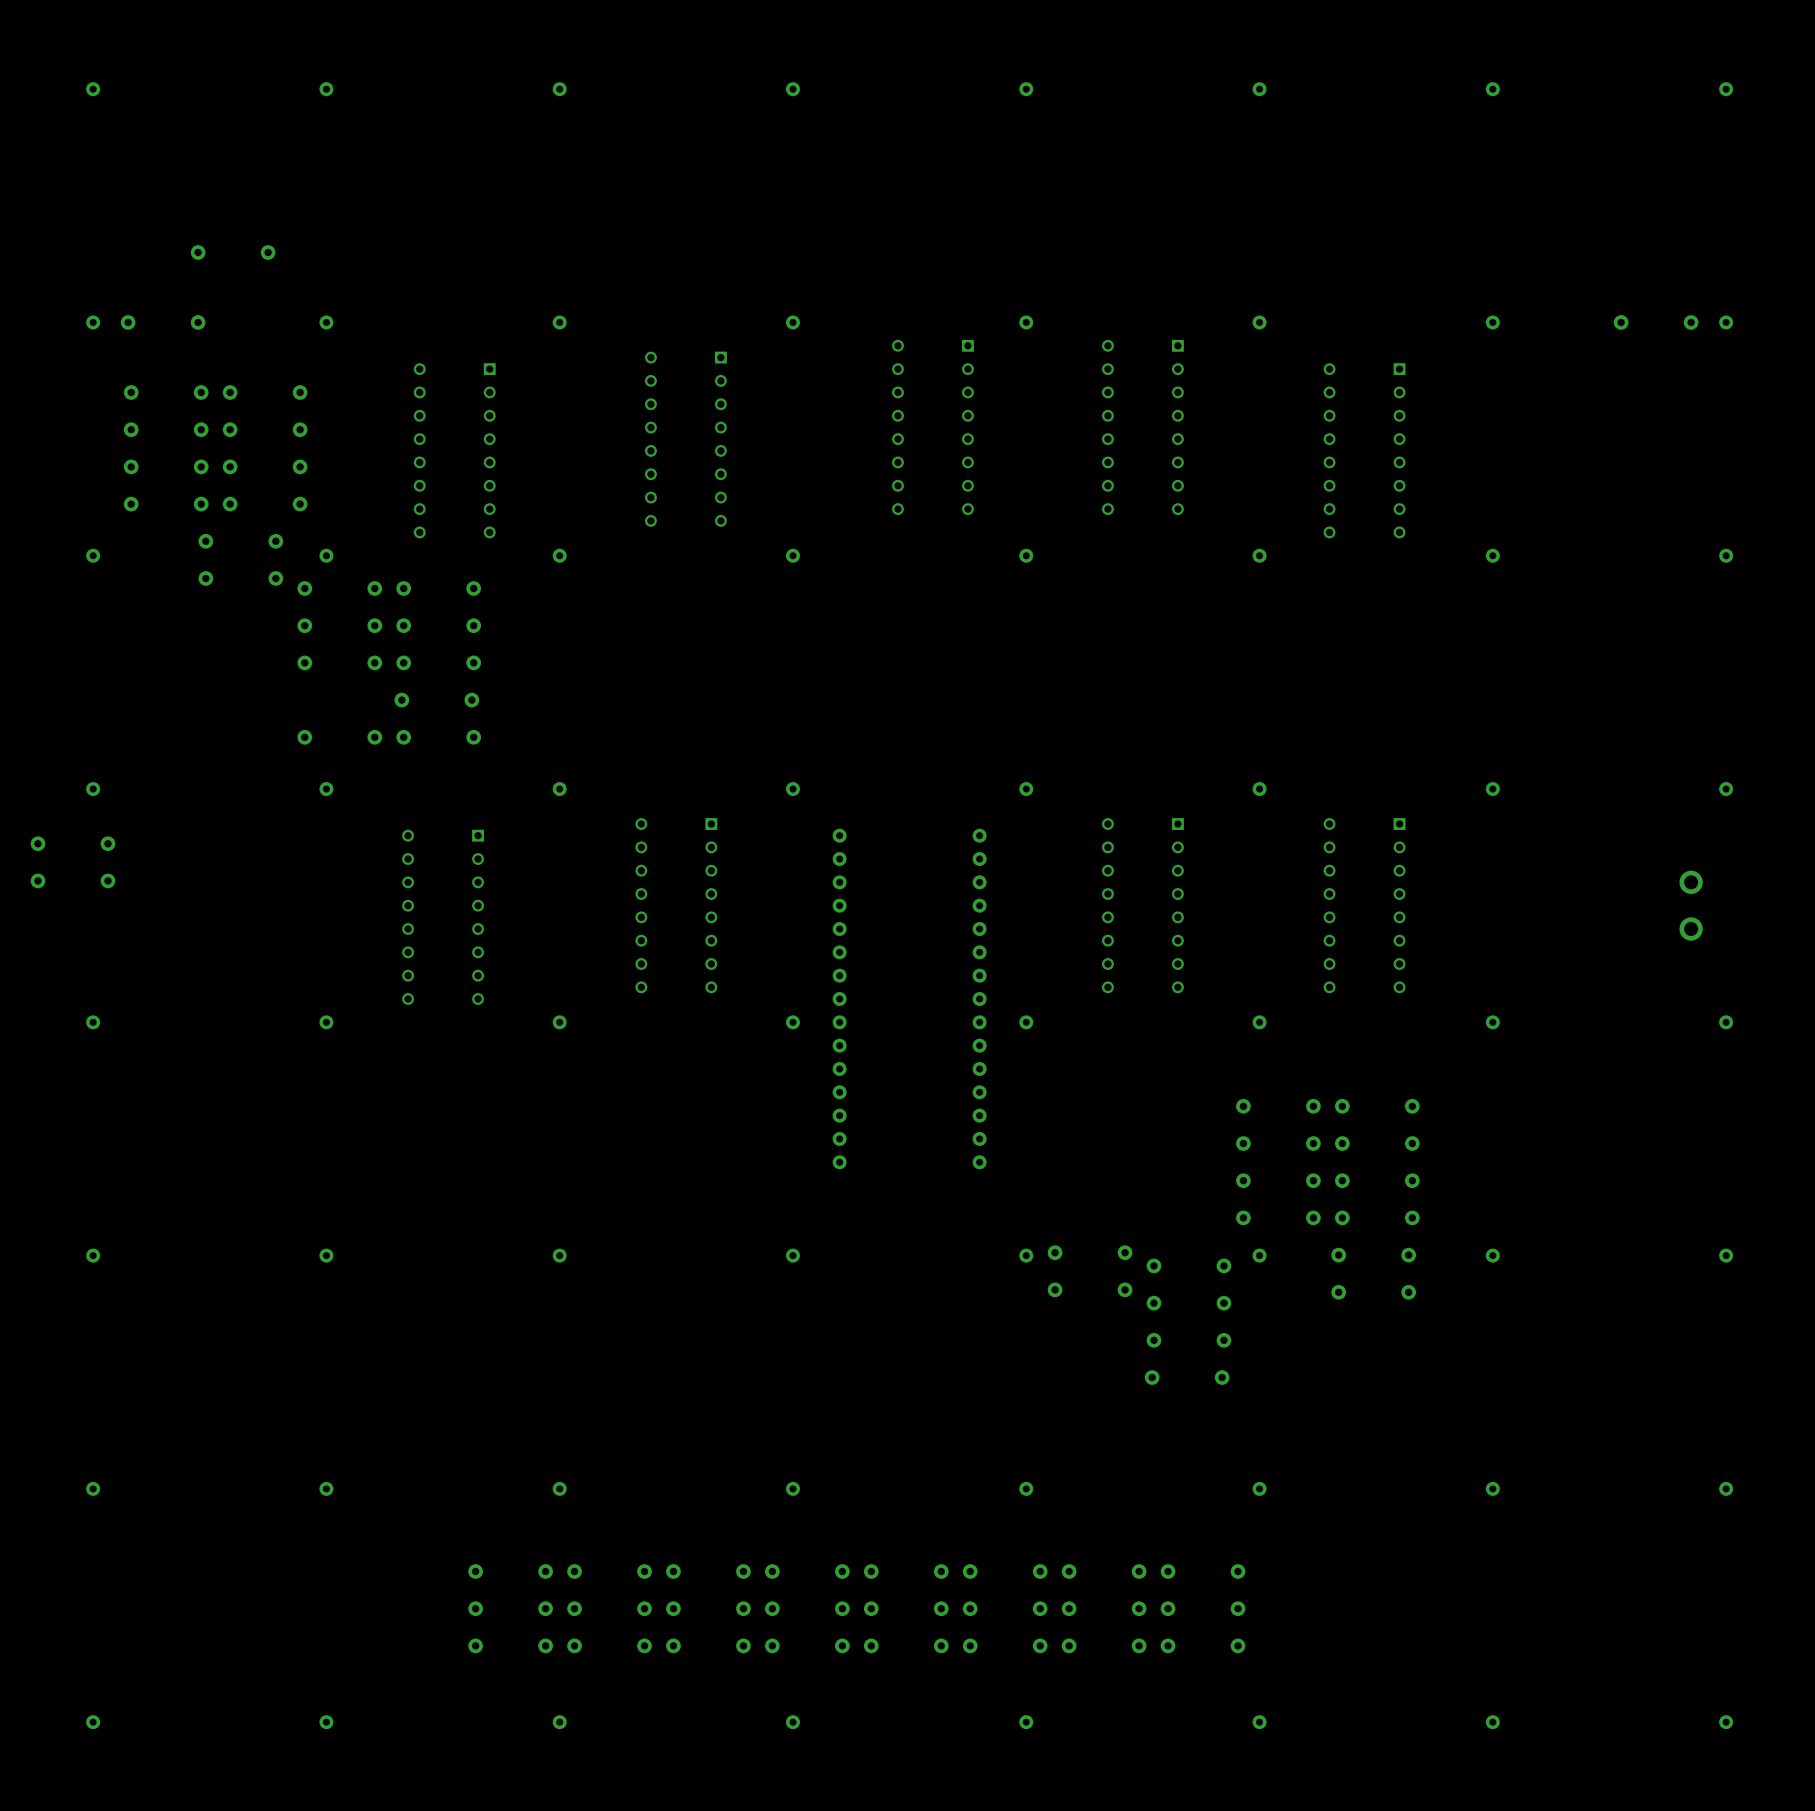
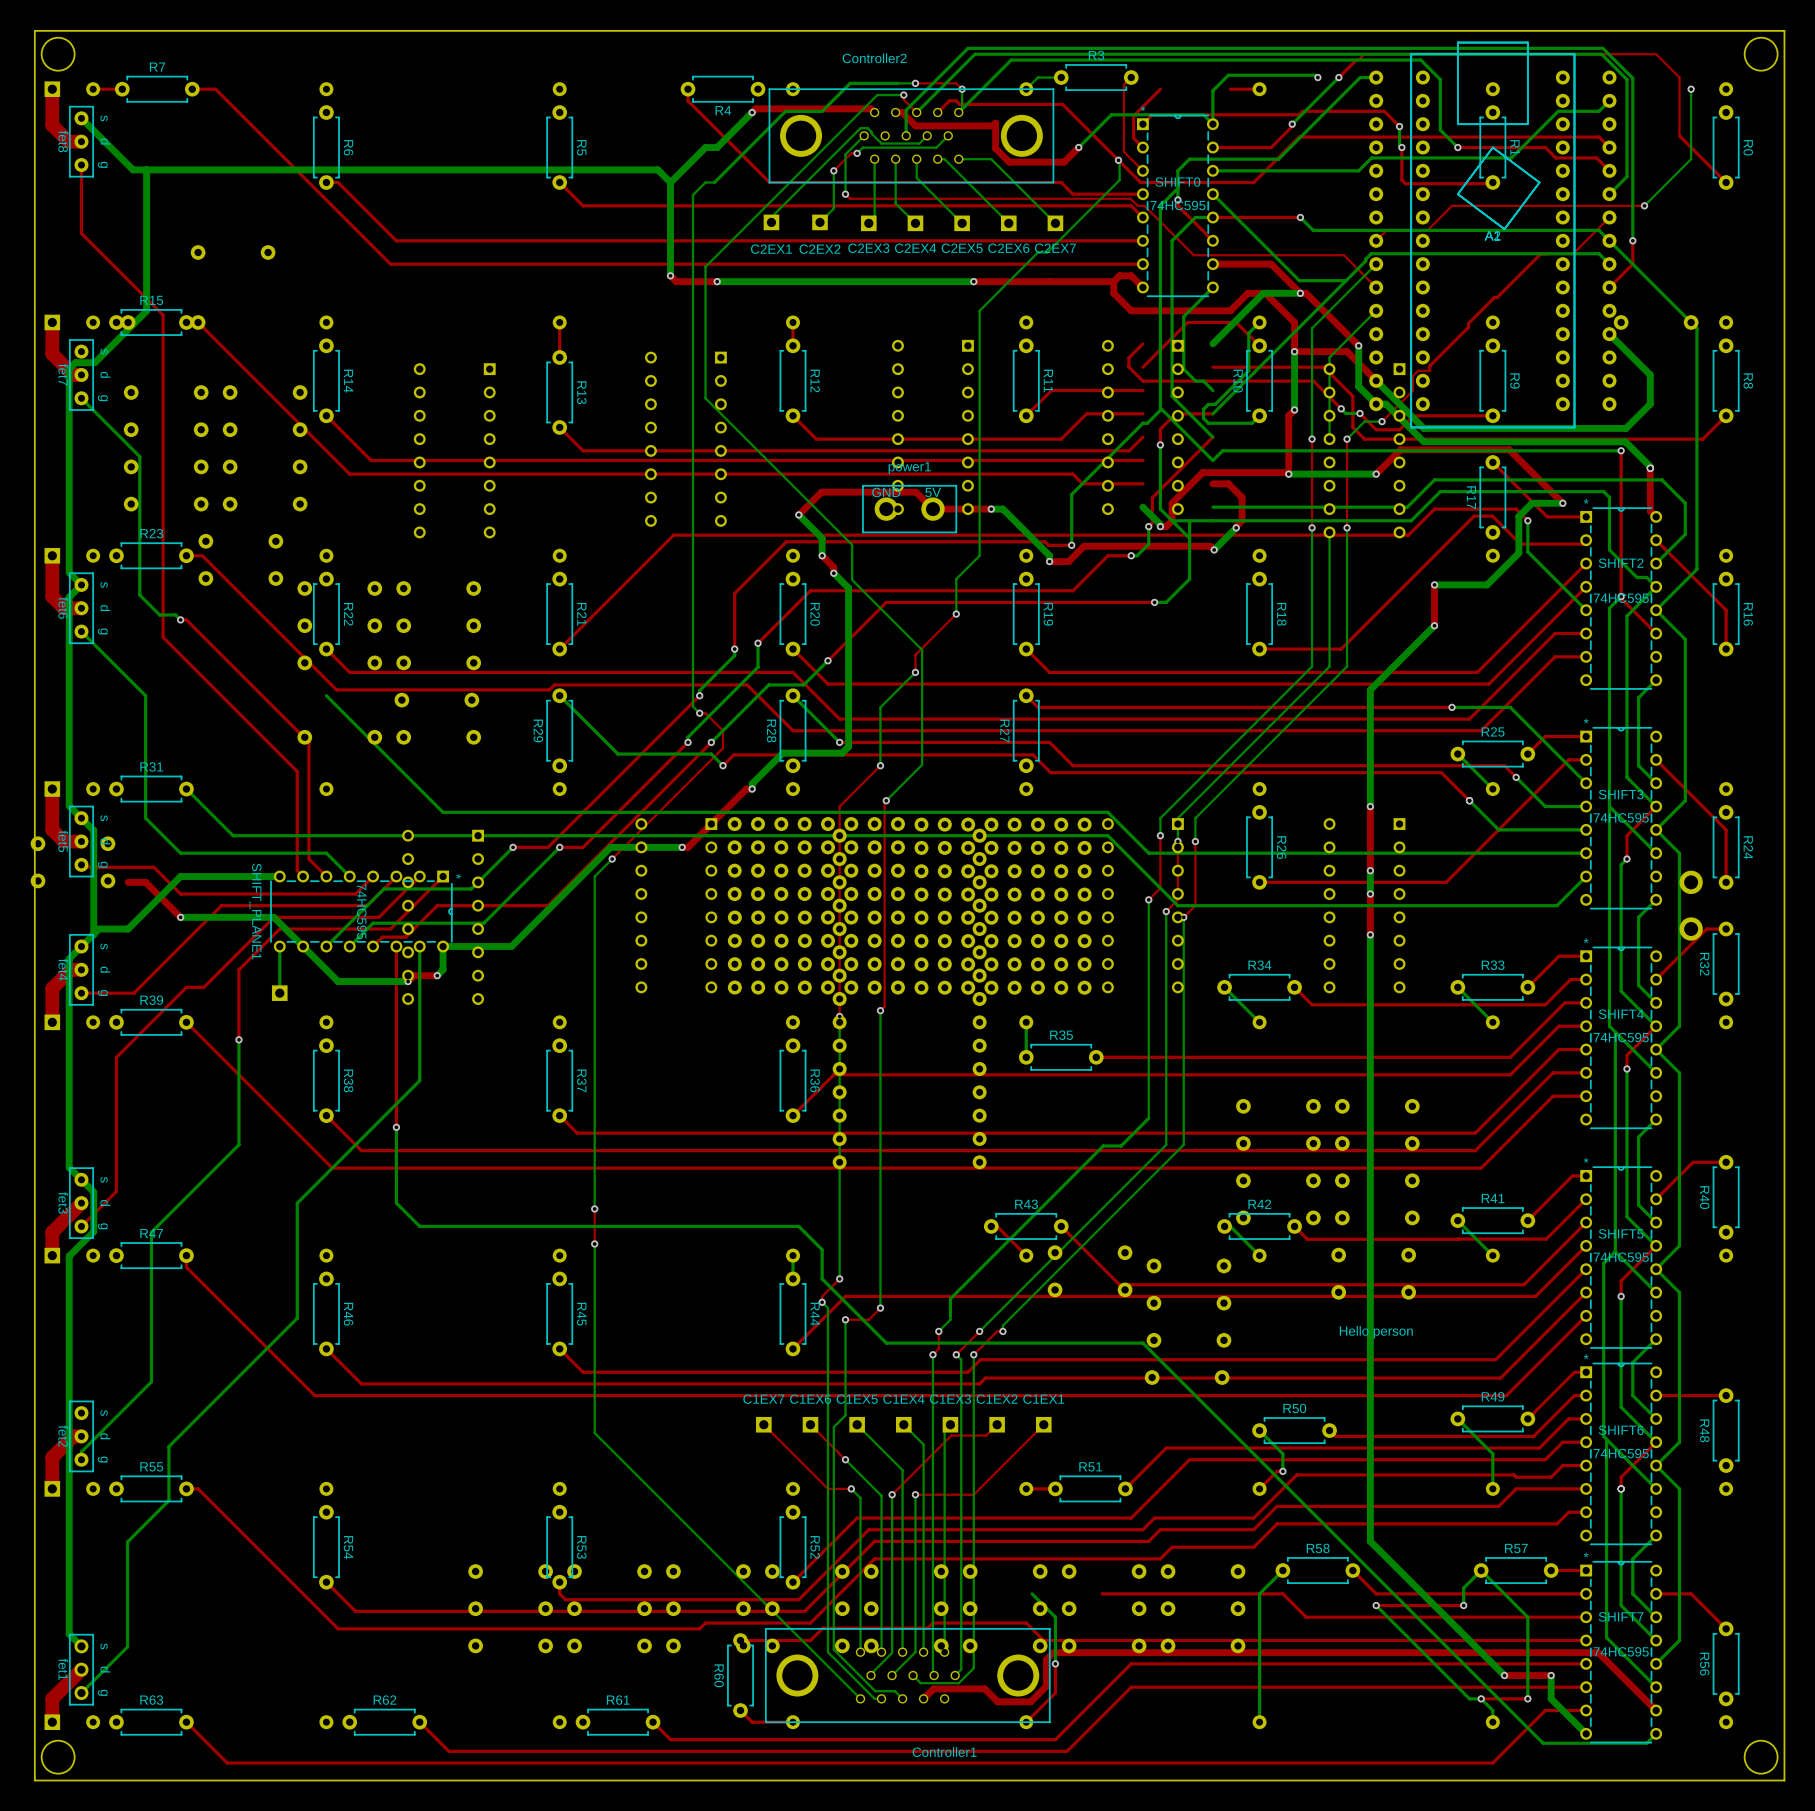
board edge: none -> (1784, 30) (34, 30) (34, 1780) (1784, 1780) (1784, 30)
round board edge: none -> [41, 37, 75, 71]
round board edge: none -> [1744, 37, 1778, 71]
bottom track: none -> (1061, 77) (1037, 77) (1026, 89)
R3: none -> (1096, 77)
top track: none -> (1131, 77) (1123, 84) (1123, 151) (1142, 170)
bottom track: none -> (1317, 77) (1315, 75) (1228, 75) (1212, 90) (1212, 124) (1203, 114) (1111, 114) (1078, 147)
via: none -> (1317, 77)
bottom track: none -> (1338, 77) (1292, 124)
top track: none -> (1338, 77) (1364, 54) (1656, 54) (1679, 77) (1679, 135) (1726, 182)
via: none -> (1338, 77)
bottom track: none -> (1376, 77) (1360, 77) (1278, 159) (1189, 159) (1177, 170) (1177, 200)
bottom track: none -> (915, 83) (850, 83) (822, 111) (785, 111) (714, 182) (705, 182) (693, 195) (693, 706) (699, 713)
top track: none -> (915, 83) (956, 83) (962, 89)
via: none -> (915, 83)
top track: none -> (52, 89) (52, 125) (68, 141) (81, 141)
part: none -> (52, 89)
top track: none -> (122, 89) (93, 89)
R7: none -> (157, 89)
top track: none -> (192, 89) (215, 89) (390, 264) (1142, 264)
top track: none -> (688, 89) (688, 100) (769, 182) (1061, 182) (1072, 194) (1142, 194)
R4: none -> (723, 89)
bottom track: none -> (962, 89) (962, 109) (958, 112) (1011, 60) (1420, 60) (1440, 79) (1440, 130) (1457, 147)
via: none -> (962, 89)
top track: none -> (1160, 89) (1133, 115) (1133, 138) (1142, 147) (1133, 138) (1133, 115)
top track: none -> (1259, 89) (1230, 89)
bottom track: none -> (1691, 89) (1691, 159) (1644, 205)
via: none -> (1691, 89)
bottom track: none -> (903, 95) (877, 95) (705, 266) (705, 398) (852, 544) (852, 579) (922, 649) (922, 764) (886, 800)
top track: none -> (903, 95) (903, 99) (916, 112)
via: none -> (903, 95)
bottom track: none -> (1609, 100) (1599, 111) (1558, 111) (1511, 157) (1371, 157) (1358, 170) (1212, 170)
bottom track: none -> (752, 112) (717, 147) (705, 147) (670, 182)
via: none -> (752, 112)
top track: none -> (874, 112) (870, 108) (755, 108) (752, 112)
top track: none -> (895, 112) (902, 112) (915, 125) (992, 125) (995, 123) (995, 148) (1009, 162) (1064, 162) (1078, 147)
bottom track: none -> (916, 112) (975, 54) (1601, 54) (1626, 79) (1626, 176) (1609, 194)
top track: none -> (937, 112) (949, 100) (956, 100) (959, 104) (1062, 104) (1140, 182) (1253, 182) (1299, 137) (1599, 137) (1609, 147)
bottom track: none -> (81, 118) (133, 169) (657, 169) (670, 182)
top track: none -> (1142, 124) (1152, 114) (1299, 114) (1302, 111) (1384, 111) (1399, 126)
top track: none -> (1292, 124) (1292, 126) (1271, 147) (1212, 147)
via: none -> (1292, 124)
bottom track: none -> (1399, 126) (1399, 145) (1401, 147)
via: none -> (1399, 126)
bottom track: none -> (864, 135) (845, 154) (845, 194)
bottom track: none -> (906, 135) (906, 110) (967, 48) (1602, 48) (1632, 78) (1632, 240)
Controller2: none -> (911, 135)
bottom track: none -> (927, 135) (919, 143) (881, 143) (867, 128) (860, 128) (771, 217) (771, 222)
bottom track: none -> (948, 135) (936, 147) (862, 147) (857, 153)
fet8: none -> (81, 141)
R6: none -> (326, 147)
R5: none -> (559, 147)
via: none -> (1078, 147)
top track: none -> (1401, 147) (1401, 180) (1405, 183) (1492, 182)
via: none -> (1401, 147)
top track: none -> (1457, 147) (1545, 147) (1555, 157) (1596, 157) (1609, 170)
via: none -> (1457, 147)
R1: none -> (1492, 147)
R0: none -> (1726, 147)
top track: none -> (857, 153) (851, 153) (833, 170)
via: none -> (857, 153)
bottom track: none -> (874, 159) (874, 217) (868, 223)
bottom track: none -> (895, 159) (895, 203) (915, 223)
bottom track: none -> (916, 159) (916, 177) (962, 223)
bottom track: none -> (937, 159) (944, 159) (1008, 223)
bottom track: none -> (958, 159) (991, 159) (1055, 223)
bottom track: none -> (1118, 160) (1119, 159) (1119, 180) (1047, 252) (1037, 252) (979, 310) (979, 555) (956, 579) (956, 614)
via: none -> (1118, 160)
top track: none -> (81, 165) (81, 233) (163, 315) (163, 637) (297, 771) (297, 870) (303, 876)
bottom track: none -> (146, 169) (146, 311) (94, 362) (75, 362) (69, 369) (69, 572) (81, 584) (69, 597) (69, 805) (93, 830) (93, 934)
bottom track: none -> (833, 170) (833, 208) (820, 222)
via: none -> (833, 170)
top track: none -> (326, 182) (338, 182) (396, 240) (1142, 240)
top track: none -> (559, 182) (583, 205) (1131, 205) (1142, 217)
bottom track: none -> (670, 182) (670, 275)
bottom track: none -> (1177, 188) (1160, 205) (1160, 410) (1147, 423) (1142, 423) (1071, 494) (1071, 545)
top track: none -> (845, 194) (850, 198) (1130, 198) (1137, 205) (1144, 205) (1193, 255) (1343, 255) (1376, 287)
via: none -> (845, 194)
bottom track: none -> (1212, 194) (1299, 280) (1346, 280)
top track: none -> (1177, 200) (1177, 205) (1212, 240)
via: none -> (1177, 200)
SHIFT0: none -> 74HC595 (1177, 205)
top track: none -> (1644, 205) (1452, 205) (1427, 230) (1386, 230) (1376, 240)
via: none -> (1644, 205)
bottom track: none -> (1212, 217) (1195, 217) (1172, 240) (1172, 396) (1212, 437)
bottom track: none -> (1300, 217) (1313, 230) (1599, 230) (1696, 328) (1696, 569) (1656, 610) (1685, 639) (1685, 800) (1656, 829) (1679, 853) (1679, 1026) (1656, 1049) (1679, 1072) (1679, 1245) (1656, 1269) (1679, 1292) (1679, 1442) (1656, 1465) (1679, 1488) (1679, 1640) (1656, 1663)
top track: none -> (1300, 217) (1212, 217)
via: none -> (1300, 217)
top track: none -> (1609, 217) (1572, 254) (1540, 254) (1468, 323) (1468, 327) (1429, 366) (1429, 370) (1418, 370) (1412, 376) (1412, 390) (1382, 421)
C2EX1: none -> (771, 222)
C2EX2: none -> (820, 222)
C2EX3: none -> (868, 223)
C2EX4: none -> (915, 223)
C2EX5: none -> (962, 223)
C2EX6: none -> (1008, 223)
C2EX7: none -> (1055, 223)
part: none -> (1492, 235)
part: none -> (1492, 235)
top track: none -> (1632, 240) (1632, 264) (1609, 287)
via: none -> (1632, 240)
top track: none -> (1212, 264) (1271, 264) (1300, 293) (1306, 293) (1358, 345)
bottom track: none -> (1376, 264) (1312, 328) (1312, 439)
bottom track: none -> (1609, 264) (1599, 253) (1371, 253) (1212, 413)
top track: none -> (670, 275) (676, 281) (717, 281)
via: none -> (670, 275)
via: none -> (717, 281)
bottom track: none -> (973, 281) (717, 281)
via: none -> (973, 281)
top track: none -> (1113, 281) (1113, 293) (1131, 310) (1230, 310) (1247, 293) (1265, 293) (1294, 322) (1294, 351) (1347, 351) (1376, 380)
top track: none -> (1113, 281) (1119, 275) (1131, 275) (1142, 287)
top track: none -> (1113, 281) (973, 281)
bottom track: none -> (1212, 287) (1183, 316) (1183, 369) (1195, 381) (1203, 381) (1212, 390)
bottom track: none -> (1300, 293) (1263, 293) (1212, 343)
via: none -> (1300, 293)
bottom track: none -> (1376, 310) (1329, 357) (1329, 439)
top track: none -> (52, 322) (52, 353) (73, 374) (81, 374)
part: none -> (52, 322)
R15: none -> (151, 322)
top track: none -> (186, 322) (198, 322) (349, 474) (1072, 474) (1082, 483) (1142, 483)
top track: none -> (559, 322) (559, 357)
top track: none -> (793, 322) (793, 345)
bottom track: none -> (1259, 322) (1248, 333) (1248, 370) (1215, 404) (1208, 404) (1203, 409) (1203, 418) (1208, 423) (1252, 423) (1259, 415)
bottom track: none -> (1609, 334) (1650, 374) (1650, 404) (1626, 428) (1423, 428) (1376, 380)
top track: none -> (1142, 343) (1128, 357) (1128, 367) (1142, 381) (1313, 381) (1341, 408)
top track: none -> (1259, 345) (1236, 322) (1187, 322) (1142, 367)
bottom track: none -> (1358, 345) (1358, 386) (1376, 404) (1386, 404) (1423, 441) (1625, 441) (1650, 468)
via: none -> (1358, 345)
bottom track: none -> (1294, 351) (1294, 409)
via: none -> (1294, 351)
top track: none -> (1212, 367) (1323, 367) (1352, 396) (1352, 427) (1364, 439) (1702, 439) (1726, 415)
fet7: none -> (81, 374)
R14: none -> (326, 380)
R12: none -> (793, 380)
R11: none -> (1026, 380)
R10: none -> (1259, 380)
R9: none -> (1492, 380)
R8: none -> (1726, 380)
top track: none -> (1142, 390) (1051, 390) (1026, 415)
R13: none -> (559, 392)
bottom track: none -> (81, 398) (139, 456) (139, 595) (159, 614) (175, 614) (180, 619)
bottom track: none -> (1160, 408) (1212, 460) (1222, 450) (1621, 450)
bottom track: none -> (1341, 408) (1345, 413) (1359, 413)
via: none -> (1341, 408)
top track: none -> (1294, 409) (1288, 415) (1288, 474) (1202, 472) (1172, 503) (1172, 520) (1166, 526) (1160, 526)
via: none -> (1294, 409)
top track: none -> (1142, 413) (1086, 413) (1061, 439) (816, 439) (793, 415)
top track: none -> (1212, 413) (1175, 413) (1160, 429) (1160, 444)
top track: none -> (1359, 413) (1376, 429) (1399, 429) (1413, 415) (1492, 415)
via: none -> (1359, 413)
top track: none -> (326, 415) (371, 460) (1142, 460)
bottom track: none -> (1382, 421) (1364, 421) (1347, 439)
via: none -> (1382, 421)
top track: none -> (559, 427) (583, 450) (1129, 450) (1142, 437)
top track: none -> (1212, 437) (1152, 497) (1152, 522) (1148, 526)
top track: none -> (1312, 439) (1312, 527)
via: none -> (1312, 439)
top track: none -> (1347, 439) (1347, 527)
via: none -> (1347, 439)
bottom track: none -> (1160, 444) (1160, 509) (1189, 538)
via: none -> (1160, 444)
top track: none -> (1621, 450) (1621, 598) (1656, 633)
via: none -> (1621, 450)
top track: none -> (1492, 462) (1547, 516) (1586, 516)
top track: none -> (1650, 468) (1650, 511) (1656, 516)
via: none -> (1650, 468)
via: none -> (1288, 474)
bottom track: none -> (1376, 474) (1288, 474)
top track: none -> (1376, 474) (1400, 449) (1509, 449) (1562, 503)
via: none -> (1376, 474)
top track: none -> (1212, 483) (1228, 483) (1242, 497) (1242, 520) (1236, 527)
R17: none -> (1492, 497)
bottom track: none -> (1562, 503) (1532, 503) (1518, 516) (1518, 553) (1487, 584) (1434, 584)
via: none -> (1562, 503)
bottom track: none -> (1142, 507) (1160, 526)
bottom track: none -> (1212, 507) (1407, 507) (1434, 479) (1661, 479) (1685, 503) (1685, 534) (1656, 563)
power1: none -> (909, 509)
bottom track: none -> (991, 509) (1002, 509) (1049, 555) (1049, 561)
top track: none -> (991, 509) (932, 509) (916, 492) (821, 492) (798, 514)
via: none -> (991, 509)
bottom track: none -> (798, 514) (822, 538) (822, 555)
via: none -> (798, 514)
bottom track: none -> (1172, 520) (1411, 520) (1440, 491) (1603, 491) (1609, 497) (1609, 549) (1637, 577) (1646, 577) (1656, 586) (1626, 616) (1626, 777) (1656, 806)
bottom track: none -> (1189, 520) (1189, 579) (1166, 602) (1154, 602)
bottom track: none -> (1527, 520) (1527, 551) (1586, 610)
top track: none -> (1527, 520) (1516, 509) (1434, 509) (1408, 535) (673, 535) (559, 649)
via: none -> (1527, 520)
bottom track: none -> (1148, 526) (1148, 544) (1137, 555) (1131, 555)
via: none -> (1148, 526)
via: none -> (1160, 526)
bottom track: none -> (1236, 527) (1214, 549)
via: none -> (1236, 527)
bottom track: none -> (1312, 527) (1312, 666) (1160, 818) (1160, 835)
via: none -> (1312, 527)
bottom track: none -> (1329, 527) (1329, 666) (1177, 818) (1177, 841)
bottom track: none -> (1347, 527) (1347, 666) (1195, 818) (1195, 841)
via: none -> (1347, 527)
top track: none -> (1586, 540) (1582, 544) (1520, 544) (1492, 516) (1474, 516) (1341, 649) (1259, 649)
top track: none -> (1656, 540) (1726, 610) (1726, 649)
top track: none -> (1071, 545) (1048, 545) (1045, 541) (786, 541) (734, 593) (734, 649)
via: none -> (1071, 545)
top track: none -> (1214, 549) (1210, 546) (1084, 546) (1068, 561) (1049, 561)
via: none -> (1214, 549)
top track: none -> (52, 555) (52, 596) (63, 608) (81, 608)
part: none -> (52, 555)
R23: none -> (151, 555)
top track: none -> (186, 555) (202, 555) (336, 689) (549, 689) (554, 684) (747, 684) (793, 730) (1481, 730) (1555, 656) (1586, 656)
top track: none -> (822, 555) (833, 567) (833, 573)
via: none -> (822, 555)
top track: none -> (1131, 555) (1107, 555) (1072, 590) (810, 590) (758, 643)
via: none -> (1131, 555)
via: none -> (1049, 561)
top track: none -> (1586, 563) (1477, 672) (1049, 672) (1026, 649)
bottom track: none -> (833, 573) (848, 588) (848, 746) (842, 753) (782, 753) (752, 783) (752, 789)
via: none -> (833, 573)
top track: none -> (1434, 584) (1434, 625)
via: none -> (1434, 584)
top track: none -> (1586, 586) (1488, 684) (827, 684) (793, 649)
bottom track: none -> (1621, 596) (1609, 608) (1609, 1026) (1656, 1072)
via: none -> (1621, 596)
SHIFT2: none -> 74HC595 (1621, 598)
top track: none -> (1154, 602) (886, 602) (827, 660)
via: none -> (1154, 602)
fet6: none -> (81, 608)
R22: none -> (326, 614)
R21: none -> (559, 614)
R20: none -> (793, 614)
top track: none -> (956, 614) (915, 654) (915, 672)
via: none -> (956, 614)
R19: none -> (1026, 614)
R18: none -> (1259, 614)
R16: none -> (1726, 614)
top track: none -> (180, 619) (186, 619) (308, 742) (308, 859) (326, 876)
via: none -> (180, 619)
bottom track: none -> (1434, 625) (1370, 689) (1370, 806)
via: none -> (1434, 625)
bottom track: none -> (81, 631) (145, 695) (145, 818) (180, 853) (326, 853) (349, 876)
top track: none -> (1586, 633) (1555, 633) (1469, 719) (839, 719) (793, 672) (349, 672) (326, 649)
bottom track: none -> (758, 643) (758, 667) (688, 737) (688, 742)
via: none -> (758, 643)
bottom track: none -> (734, 649) (734, 655) (699, 690) (699, 695)
via: none -> (734, 649)
bottom track: none -> (827, 660) (803, 684) (768, 684) (711, 742)
via: none -> (827, 660)
bottom track: none -> (915, 672) (880, 707) (880, 765)
via: none -> (915, 672)
bottom track: none -> (1656, 680) (1638, 697) (1638, 765) (1656, 783)
bottom track: none -> (326, 695) (443, 812) (1107, 812) (1148, 853) (1586, 853)
bottom track: none -> (559, 695) (618, 754) (711, 754) (723, 765)
top track: none -> (699, 695) (548, 847) (513, 847)
via: none -> (699, 695)
bottom track: none -> (793, 695) (839, 742)
top track: none -> (1026, 695) (1037, 707) (1452, 707)
bottom track: none -> (1452, 707) (1510, 707) (1586, 783)
via: none -> (1452, 707)
top track: none -> (699, 713) (705, 713) (723, 730) (723, 748) (612, 859)
via: none -> (699, 713)
R29: none -> (559, 730)
R28: none -> (793, 730)
R27: none -> (1026, 730)
top track: none -> (1586, 736) (1545, 736) (1527, 754)
top track: none -> (688, 742) (583, 847) (559, 847)
via: none -> (688, 742)
top track: none -> (711, 742) (548, 905) (437, 905) (405, 937) (382, 937) (373, 946)
via: none -> (711, 742)
top track: none -> (839, 742) (1049, 742) (1072, 765) (1504, 765) (1516, 777)
via: none -> (839, 742)
bottom track: none -> (1457, 754) (1492, 789)
R25: none -> (1492, 754)
top track: none -> (1586, 759) (1568, 759) (1446, 882) (1259, 882)
top track: none -> (1656, 759) (1726, 829) (1726, 882)
top track: none -> (723, 765) (733, 754) (1032, 754) (1050, 772) (1441, 772) (1469, 800)
via: none -> (723, 765)
top track: none -> (880, 765) (839, 806) (839, 1016)
via: none -> (880, 765)
bottom track: none -> (1516, 777) (1545, 806) (1586, 806)
via: none -> (1516, 777)
top track: none -> (52, 789) (52, 829) (63, 841) (81, 841)
part: none -> (52, 789)
R31: none -> (151, 789)
bottom track: none -> (186, 789) (233, 835) (1107, 835) (1177, 905) (1557, 905) (1586, 876)
top track: none -> (752, 789) (746, 789) (688, 847) (682, 847)
via: none -> (752, 789)
top track: none -> (886, 800) (884, 802) (884, 1006) (880, 1010)
via: none -> (886, 800)
bottom track: none -> (1469, 800) (1498, 829) (1586, 829)
via: none -> (1469, 800)
top track: none -> (1370, 806) (1370, 870)
via: none -> (1370, 806)
bottom track: none -> (1609, 806) (1656, 853)
top track: none -> (1656, 806) (1626, 835) (1626, 859)
SHIFT3: none -> 74HC595 (1621, 818)
top track: none -> (1160, 835) (1160, 888) (1148, 899)
via: none -> (1160, 835)
fet5: none -> (81, 841)
top track: none -> (1177, 841) (1177, 899) (1166, 911)
via: none -> (1177, 841)
top track: none -> (1195, 841) (1195, 905) (1183, 917)
via: none -> (1195, 841)
bottom track: none -> (513, 847) (471, 888) (383, 888) (326, 946)
via: none -> (513, 847)
bottom track: none -> (559, 847) (483, 923) (373, 923) (349, 946)
via: none -> (559, 847)
bottom track: none -> (682, 847) (610, 847) (511, 946) (443, 946) (443, 969) (437, 975)
via: none -> (682, 847)
R26: none -> (1259, 847)
R24: none -> (1726, 847)
bottom track: none -> (612, 859) (594, 876) (594, 1208)
via: none -> (612, 859)
part: none -> (769, 859)
part: none -> (862, 859)
part: none -> (956, 859)
part: none -> (1049, 859)
bottom track: none -> (1626, 859) (1621, 864) (1621, 991) (1656, 1026)
via: none -> (1626, 859)
top track: none -> (81, 864) (83, 867) (153, 867) (180, 894) (355, 894) (373, 876)
bottom track: none -> (1370, 870) (1370, 894)
via: none -> (1370, 870)
bottom track: none -> (279, 876) (180, 876) (128, 929) (98, 929) (69, 958) (69, 1167) (93, 1192) (93, 1231) (69, 1256) (69, 1634) (81, 1646)
top track: none -> (396, 876) (367, 905) (221, 905) (133, 993) (81, 993)
top track: none -> (419, 876) (378, 917) (273, 917) (203, 987) (186, 987) (116, 1057) (116, 1191) (81, 1226)
top track: none -> (443, 876) (390, 929) (279, 929) (238, 969) (238, 1039)
top track: none -> (128, 882) (145, 882) (180, 917)
top track: none -> (1370, 894) (1370, 934)
via: none -> (1370, 894)
bottom track: none -> (1148, 899) (1148, 1118) (1121, 1145) (1103, 1145) (950, 1298) (950, 1319) (938, 1331)
via: none -> (1148, 899)
bottom track: none -> (1656, 899) (1638, 917) (1638, 985) (1656, 1002)
SHIFT_PLANE1: none -> 74HC595 (361, 911)
bottom track: none -> (1166, 911) (1166, 1144) (979, 1331)
via: none -> (1166, 911)
bottom track: none -> (180, 917) (273, 917) (338, 981) (408, 981)
via: none -> (180, 917)
bottom track: none -> (1183, 917) (1183, 1144) (1002, 1325) (1002, 1331)
via: none -> (1183, 917)
top track: none -> (1726, 929) (1706, 929) (1656, 979)
bottom track: none -> (1370, 934) (1370, 1541) (1504, 1675)
via: none -> (1370, 934)
bottom track: none -> (279, 946) (279, 993)
top track: none -> (396, 946) (396, 1127)
bottom track: none -> (419, 946) (419, 1080) (297, 1203) (297, 1318) (168, 1446) (168, 1500) (127, 1541) (127, 1646) (81, 1693)
part: none -> (769, 952)
part: none -> (862, 952)
part: none -> (956, 952)
part: none -> (1049, 952)
top track: none -> (1586, 956) (1558, 956) (1527, 987)
R32: none -> (1726, 964)
top track: none -> (81, 969) (70, 969) (52, 988) (52, 1022)
fet4: none -> (81, 969)
top track: none -> (437, 975) (413, 975) (408, 981)
via: none -> (437, 975)
top track: none -> (1586, 979) (1570, 979) (1545, 1004) (1312, 1004) (1294, 987)
via: none -> (408, 981)
bottom track: none -> (1224, 987) (1259, 1022)
R34: none -> (1259, 987)
bottom track: none -> (1457, 987) (1492, 1022)
R33: none -> (1492, 987)
part: none -> (279, 993)
top track: none -> (1586, 1002) (1564, 1002) (1510, 1057) (1096, 1057)
bottom track: none -> (880, 1010) (880, 1308)
via: none -> (880, 1010)
bottom track: none -> (839, 1016) (839, 1278)
via: none -> (839, 1016)
part: none -> (52, 1022)
R39: none -> (151, 1022)
top track: none -> (186, 1022) (332, 1168) (1481, 1168) (1553, 1096) (1586, 1096)
bottom track: none -> (1026, 1022) (1026, 1057)
top track: none -> (1586, 1026) (1558, 1026) (1510, 1074) (833, 1074) (793, 1115)
top track: none -> (1656, 1026) (1626, 1055) (1626, 1068)
bottom track: none -> (1616, 1033) (1615, 1251)
SHIFT4: none -> 74HC595 (1621, 1037)
bottom track: none -> (238, 1039) (238, 1144) (151, 1232) (151, 1381) (81, 1451) (81, 1459)
via: none -> (238, 1039)
top track: none -> (1586, 1049) (1558, 1049) (1475, 1133) (577, 1133) (559, 1115)
R35: none -> (1061, 1057)
bottom track: none -> (1626, 1068) (1626, 1216) (1656, 1245)
via: none -> (1626, 1068)
top track: none -> (1586, 1072) (1553, 1072) (1475, 1150) (361, 1150) (326, 1115)
R38: none -> (326, 1080)
R37: none -> (559, 1080)
R36: none -> (793, 1080)
bottom track: none -> (1656, 1119) (1638, 1137) (1638, 1205) (1656, 1222)
bottom track: none -> (396, 1127) (396, 1203) (419, 1226) (798, 1226) (822, 1249) (822, 1278) (886, 1343) (1142, 1343) (1543, 1743) (1646, 1743) (1656, 1733)
via: none -> (396, 1127)
top track: none -> (1726, 1162) (1693, 1162) (1656, 1199)
top track: none -> (1586, 1175) (1572, 1175) (1527, 1220)
R40: none -> (1726, 1197)
top track: none -> (1586, 1199) (1546, 1239) (1307, 1239) (1294, 1226)
top track: none -> (81, 1203) (52, 1232) (52, 1255)
fet3: none -> (81, 1203)
top track: none -> (594, 1208) (594, 1243)
via: none -> (594, 1208)
bottom track: none -> (1457, 1220) (1492, 1255)
R41: none -> (1492, 1220)
top track: none -> (1586, 1222) (1523, 1284) (1119, 1284) (1061, 1226)
top track: none -> (991, 1226) (997, 1226) (1026, 1255)
R43: none -> (1026, 1226)
bottom track: none -> (1224, 1226) (1230, 1226) (1259, 1255)
R42: none -> (1259, 1226)
bottom track: none -> (594, 1243) (594, 1433) (860, 1698)
via: none -> (594, 1243)
top track: none -> (1586, 1245) (1535, 1296) (845, 1296) (793, 1348)
top track: none -> (1656, 1245) (1621, 1280) (1621, 1296)
bottom track: none -> (1615, 1251) (1656, 1292)
bottom track: none -> (1615, 1251) (1603, 1263) (1603, 1436) (1656, 1488)
part: none -> (52, 1255)
R47: none -> (151, 1255)
top track: none -> (186, 1255) (186, 1267) (314, 1395) (1506, 1395) (1586, 1315)
bottom track: none -> (793, 1255) (793, 1278)
SHIFT5: none -> 74HC595 (1621, 1257)
top track: none -> (1586, 1269) (1495, 1359) (980, 1359) (967, 1372) (583, 1372) (559, 1348)
top track: none -> (839, 1278) (822, 1296) (822, 1302)
via: none -> (839, 1278)
top track: none -> (1586, 1292) (1500, 1378) (985, 1378) (979, 1383) (361, 1383) (326, 1348)
bottom track: none -> (1621, 1296) (1621, 1407) (1656, 1442)
via: none -> (1621, 1296)
bottom track: none -> (822, 1302) (827, 1308) (827, 1652) (874, 1698) (881, 1698)
via: none -> (822, 1302)
top track: none -> (880, 1308) (868, 1319) (845, 1319)
via: none -> (880, 1308)
R46: none -> (326, 1313)
R45: none -> (559, 1313)
R44: none -> (793, 1313)
bottom track: none -> (845, 1319) (845, 1415) (833, 1427) (833, 1649) (875, 1691) (894, 1691) (902, 1698)
via: none -> (845, 1319)
top track: none -> (938, 1331) (938, 1348) (932, 1354)
via: none -> (938, 1331)
top track: none -> (979, 1331) (956, 1354)
via: none -> (979, 1331)
top track: none -> (1002, 1331) (997, 1331) (973, 1354)
via: none -> (1002, 1331)
text: none -> Hello person (1376, 1332)
bottom track: none -> (1656, 1339) (1632, 1362) (1632, 1395) (1656, 1418)
bottom track: none -> (932, 1354) (934, 1675)
via: none -> (932, 1354)
bottom track: none -> (956, 1354) (961, 1359) (961, 1669) (955, 1675)
via: none -> (956, 1354)
bottom track: none -> (973, 1354) (973, 1668) (958, 1683) (920, 1683) (913, 1675)
via: none -> (973, 1354)
top track: none -> (1586, 1372) (1574, 1372) (1527, 1418)
top track: none -> (1586, 1395) (1574, 1395) (1533, 1436) (1335, 1436) (1329, 1430)
top track: none -> (1726, 1395) (1656, 1395)
bottom track: none -> (1457, 1418) (1492, 1453) (1492, 1488)
R49: none -> (1492, 1418)
top track: none -> (1586, 1418) (1568, 1418) (1539, 1448) (1166, 1448) (1125, 1488)
top track: none -> (763, 1424) (827, 1488) (851, 1488)
C1EX7: none -> (763, 1424)
top track: none -> (810, 1424) (845, 1459)
C1EX6: none -> (810, 1424)
bottom track: none -> (857, 1424) (902, 1470) (902, 1652)
C1EX5: none -> (857, 1424)
bottom track: none -> (903, 1424) (923, 1444) (923, 1652)
C1EX4: none -> (903, 1424)
bottom track: none -> (950, 1424) (944, 1430) (944, 1652)
C1EX3: none -> (950, 1424)
top track: none -> (997, 1424) (986, 1435) (951, 1435) (892, 1494)
C1EX2: none -> (997, 1424)
top track: none -> (1043, 1424) (973, 1494) (915, 1494)
C1EX1: none -> (1043, 1424)
bottom track: none -> (1259, 1430) (1282, 1453) (1282, 1471)
R50: none -> (1294, 1430)
R48: none -> (1726, 1430)
top track: none -> (81, 1436) (73, 1436) (52, 1457) (52, 1488)
fet2: none -> (81, 1436)
bottom track: none -> (1606, 1439) (1606, 1637) (1656, 1687)
top track: none -> (1586, 1442) (1562, 1442) (1545, 1459) (1189, 1459) (1131, 1518) (857, 1518) (793, 1582)
top track: none -> (1656, 1442) (1621, 1477) (1621, 1488)
SHIFT6: none -> 74HC595 (1621, 1453)
bottom track: none -> (845, 1459) (881, 1495) (881, 1652)
via: none -> (845, 1459)
top track: none -> (1586, 1465) (1562, 1465) (1551, 1477) (1516, 1477) (1513, 1474) (1296, 1474) (1253, 1518) (1154, 1518) (1142, 1529) (868, 1529) (798, 1599) (565, 1599) (559, 1593) (559, 1582)
top track: none -> (1282, 1471) (1277, 1471) (1259, 1488)
via: none -> (1282, 1471)
part: none -> (52, 1488)
R55: none -> (151, 1488)
top track: none -> (186, 1488) (198, 1488) (338, 1628) (699, 1628) (705, 1623) (810, 1623) (874, 1558) (1160, 1558) (1172, 1547) (1253, 1547) (1277, 1523) (1557, 1523) (1568, 1512) (1586, 1512)
bottom track: none -> (851, 1488) (860, 1498) (860, 1652)
via: none -> (851, 1488)
top track: none -> (1055, 1488) (1026, 1488)
R51: none -> (1090, 1488)
top track: none -> (1586, 1488) (1516, 1488) (1498, 1506) (1277, 1506) (1253, 1529) (1160, 1529) (1148, 1541) (874, 1541) (804, 1611) (355, 1611) (326, 1582)
bottom track: none -> (1621, 1488) (1621, 1605) (1656, 1640)
via: none -> (1621, 1488)
bottom track: none -> (892, 1494) (892, 1652) (871, 1675)
via: none -> (892, 1494)
bottom track: none -> (915, 1494) (915, 1652) (892, 1675)
via: none -> (915, 1494)
bottom track: none -> (1656, 1535) (1632, 1558) (1632, 1593) (1656, 1617)
R54: none -> (326, 1547)
R53: none -> (559, 1547)
R52: none -> (793, 1547)
bottom track: none -> (1282, 1570) (1259, 1593) (1259, 1722)
R58: none -> (1317, 1570)
top track: none -> (1352, 1570) (1376, 1593) (1586, 1593)
R57: none -> (1516, 1570)
top track: none -> (1586, 1570) (1551, 1570)
bottom track: none -> (1032, 1593) (1055, 1617) (1055, 1663)
top track: none -> (1102, 1593) (1282, 1593) (1306, 1617) (1586, 1617)
top track: none -> (1656, 1593) (1691, 1593) (1726, 1628)
bottom track: none -> (1376, 1605) (1469, 1698) (1481, 1698) (1492, 1710) (1492, 1722)
via: none -> (1376, 1605)
bottom track: none -> (1463, 1605) (1463, 1588) (1481, 1570) (1527, 1617) (1527, 1698)
top track: none -> (1463, 1605) (1376, 1605)
via: none -> (1463, 1605)
top track: none -> (1586, 1640) (1043, 1640) (1026, 1623) (932, 1623) (927, 1628) (822, 1628) (810, 1640) (740, 1640)
SHIFT7: none -> 74HC595 (1621, 1652)
top track: none -> (1055, 1663) (1055, 1693) (1026, 1722)
via: none -> (1055, 1663)
top track: none -> (1586, 1663) (1131, 1663) (1055, 1739) (670, 1739) (653, 1722)
R56: none -> (1726, 1663)
top track: none -> (81, 1669) (52, 1698) (52, 1722)
fet1: none -> (81, 1669)
R60: none -> (740, 1675)
Controller1: none -> (907, 1675)
via: none -> (1504, 1675)
bottom track: none -> (1551, 1675) (1551, 1698) (1586, 1733)
top track: none -> (1551, 1675) (1504, 1675)
via: none -> (1551, 1675)
top track: none -> (1586, 1687) (1131, 1687) (1067, 1751) (448, 1751) (419, 1722)
top track: none -> (923, 1698) (933, 1688) (984, 1688) (997, 1701) (1030, 1701) (1046, 1686) (1046, 1659) (1053, 1652) (1598, 1652) (1656, 1710)
via: none -> (1481, 1698)
top track: none -> (1527, 1698) (1481, 1698)
via: none -> (1527, 1698)
top track: none -> (740, 1710) (752, 1722) (793, 1722)
top track: none -> (1586, 1710) (1545, 1710) (1492, 1763) (227, 1763) (186, 1722)
part: none -> (52, 1722)
R63: none -> (151, 1722)
R62: none -> (384, 1722)
R61: none -> (618, 1722)
round board edge: none -> [41, 1740, 75, 1774]
round board edge: none -> [1744, 1740, 1778, 1774]

